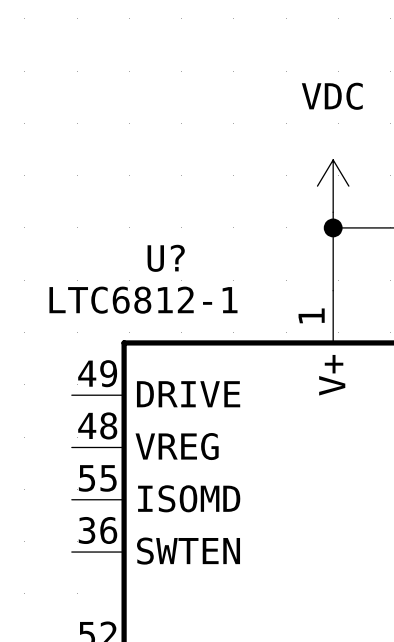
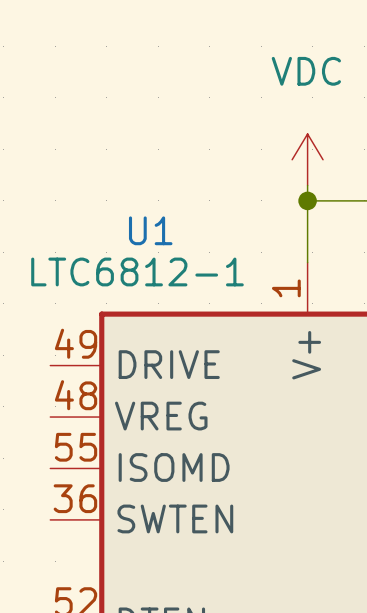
U? name: U? (166, 258) -> U1 (150, 230)

